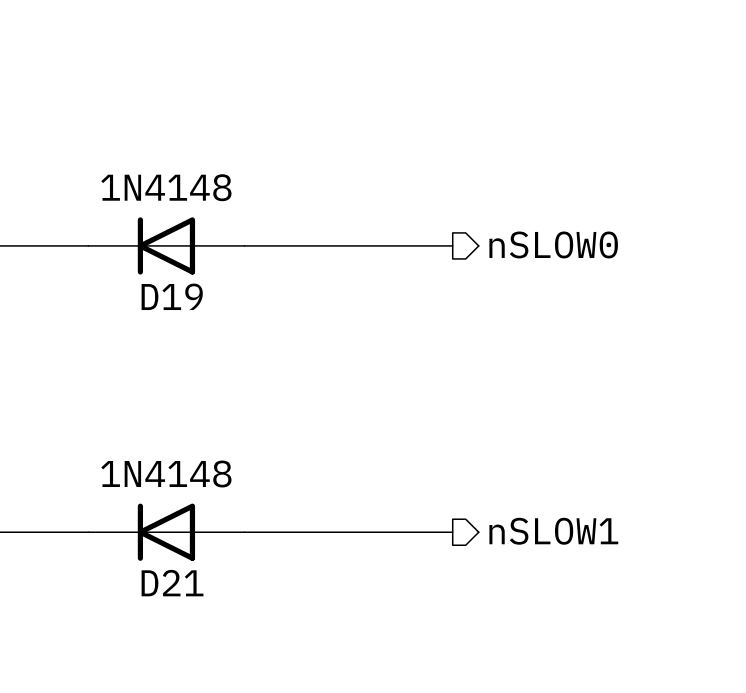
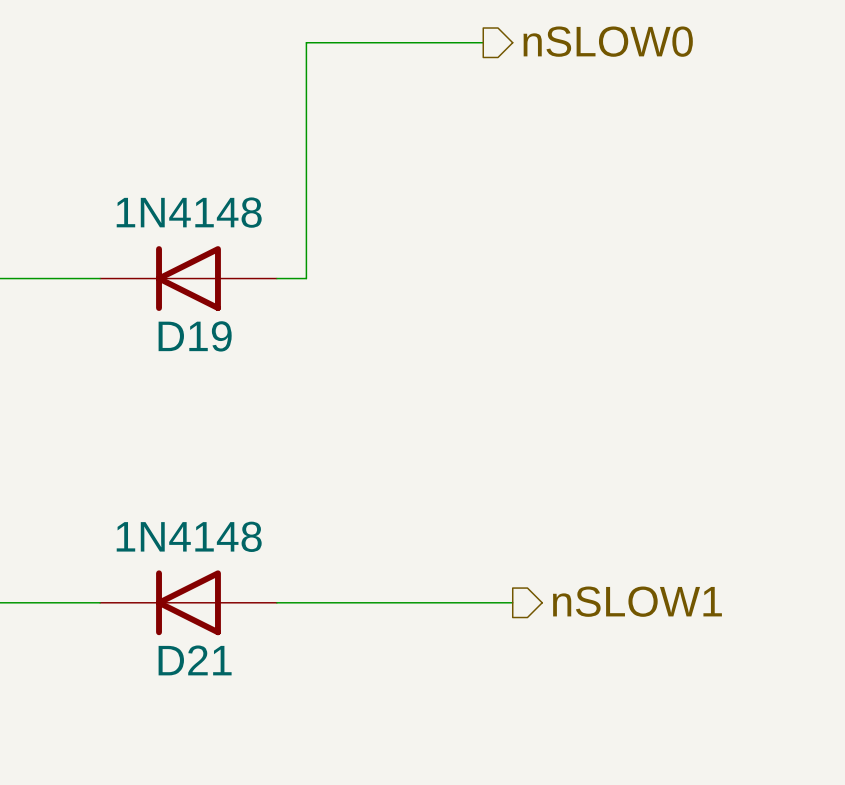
hierarchical label position: nSLOW0 (553, 244) -> nSLOW0 (608, 41)
wire: (270, 245) (452, 245) -> (306, 278) (306, 42) (483, 42)

